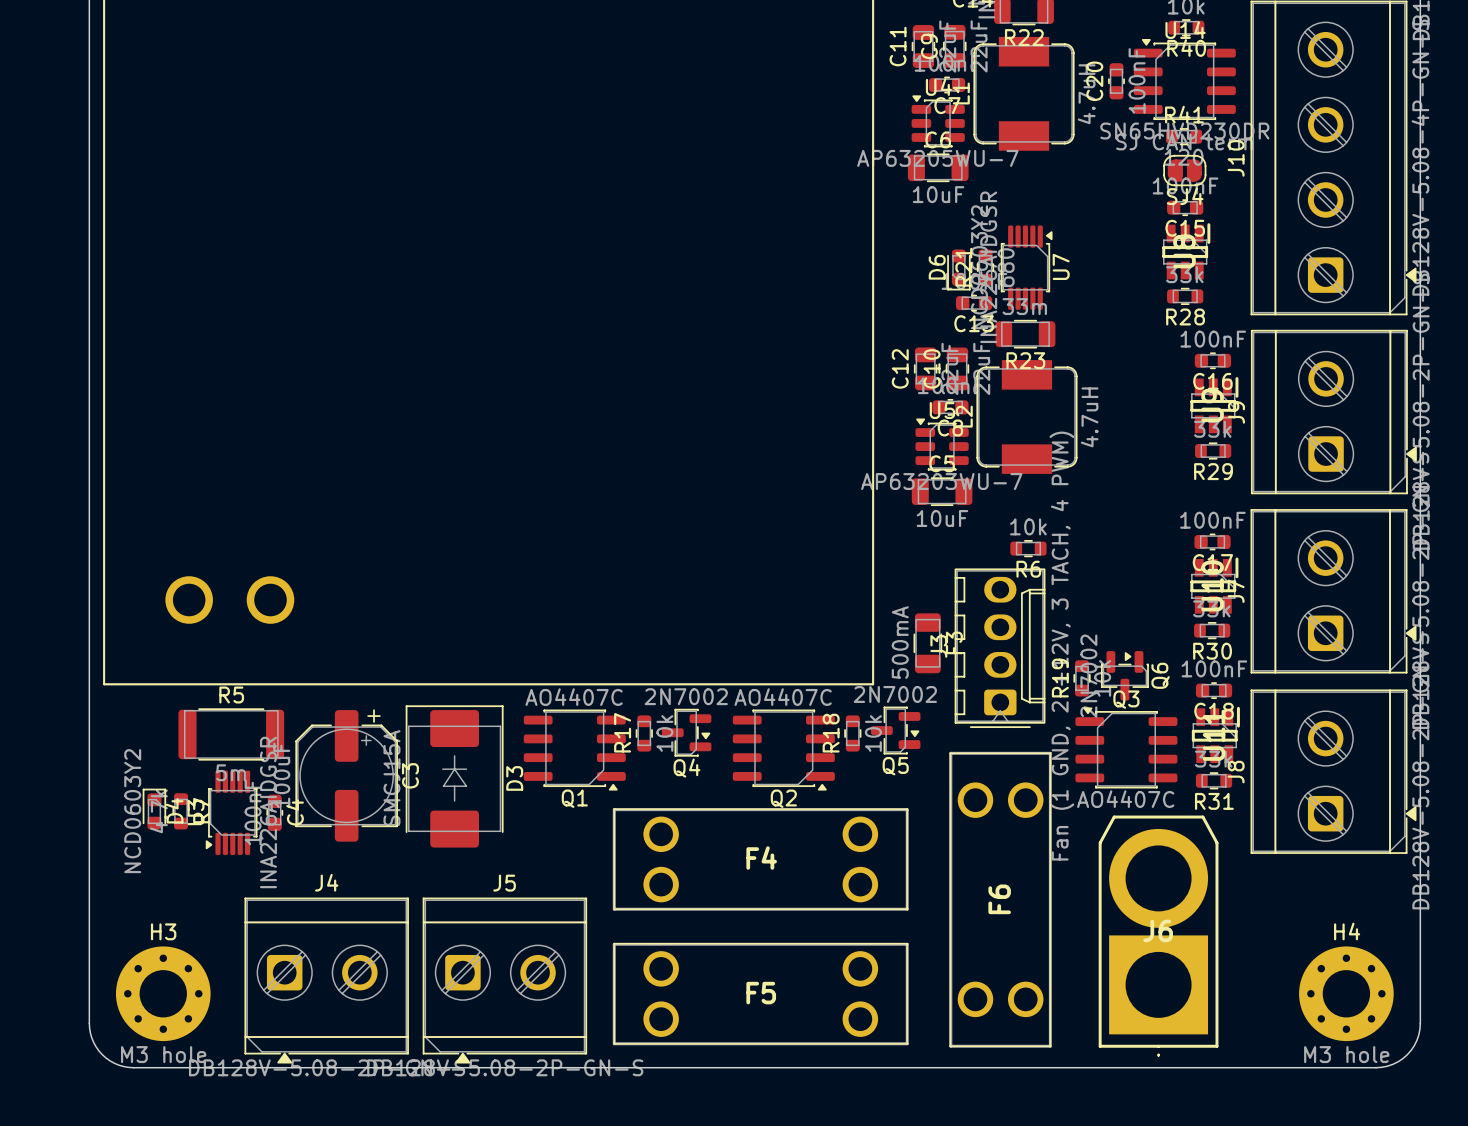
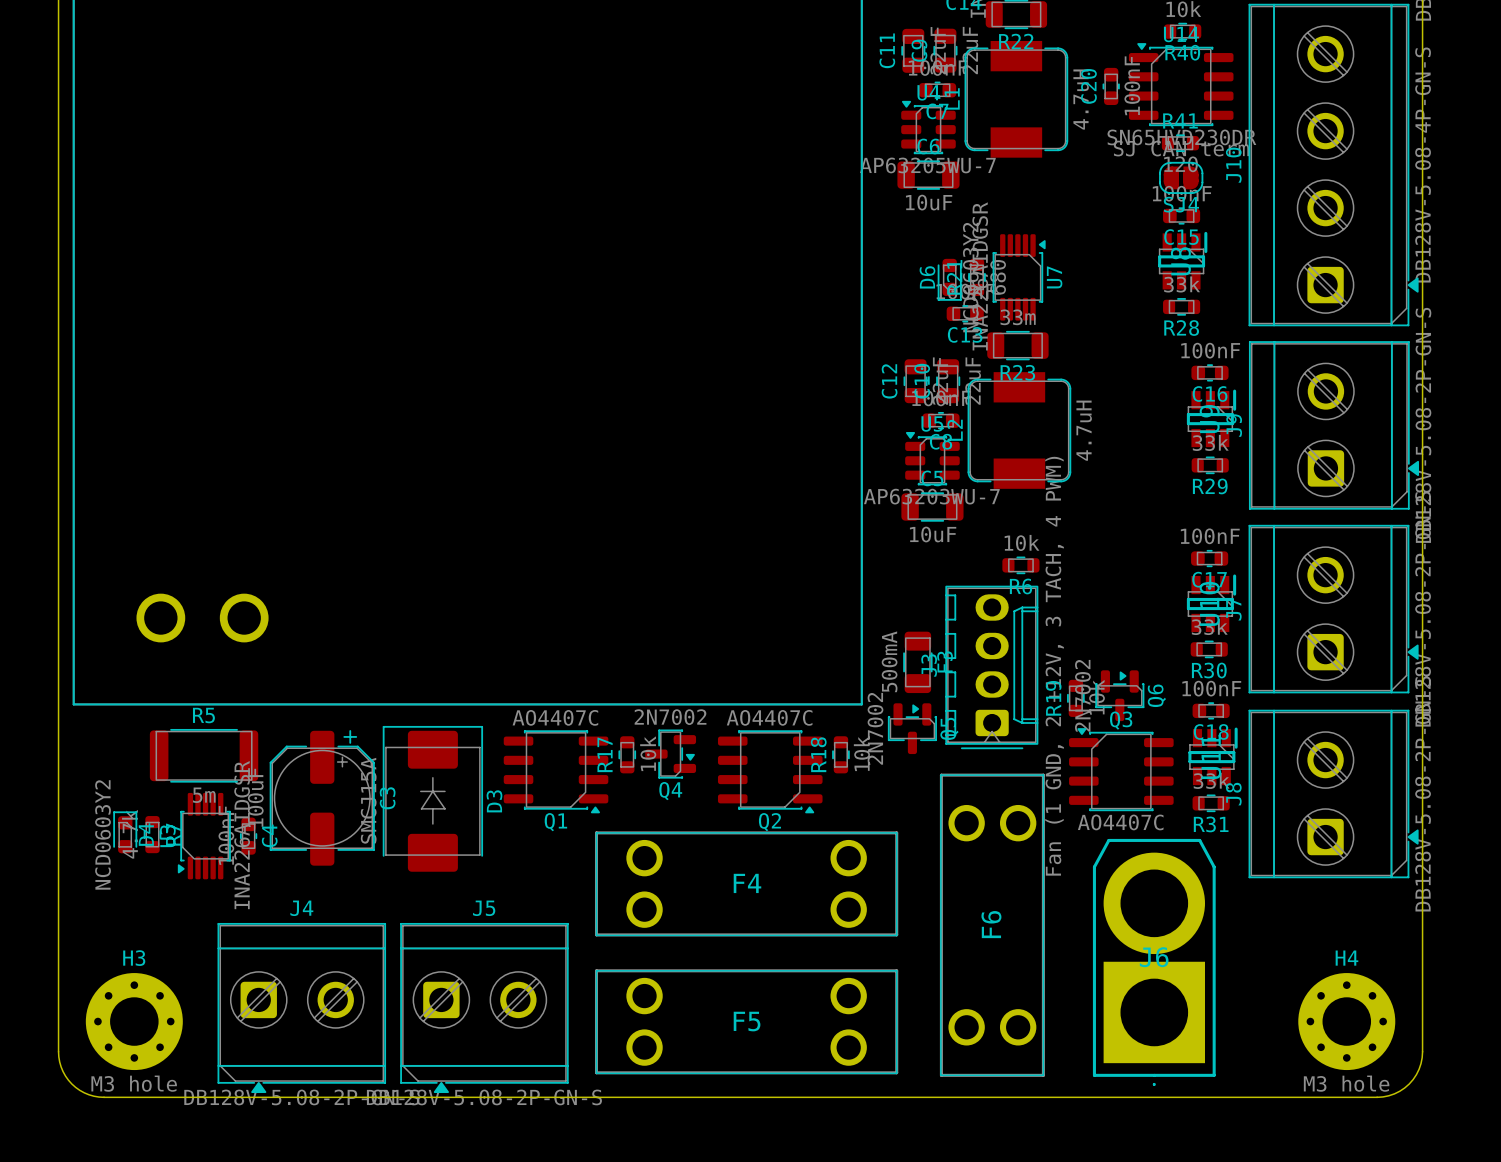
Q5 rotation: 0° (895, 730) -> 90° counterclockwise (912, 728)
Q5 position: (895, 730) -> (912, 728)
F4 rotation: 0° (760, 859) -> 180° (746, 883)
F5 rotation: 0° (760, 994) -> 180° (746, 1021)

